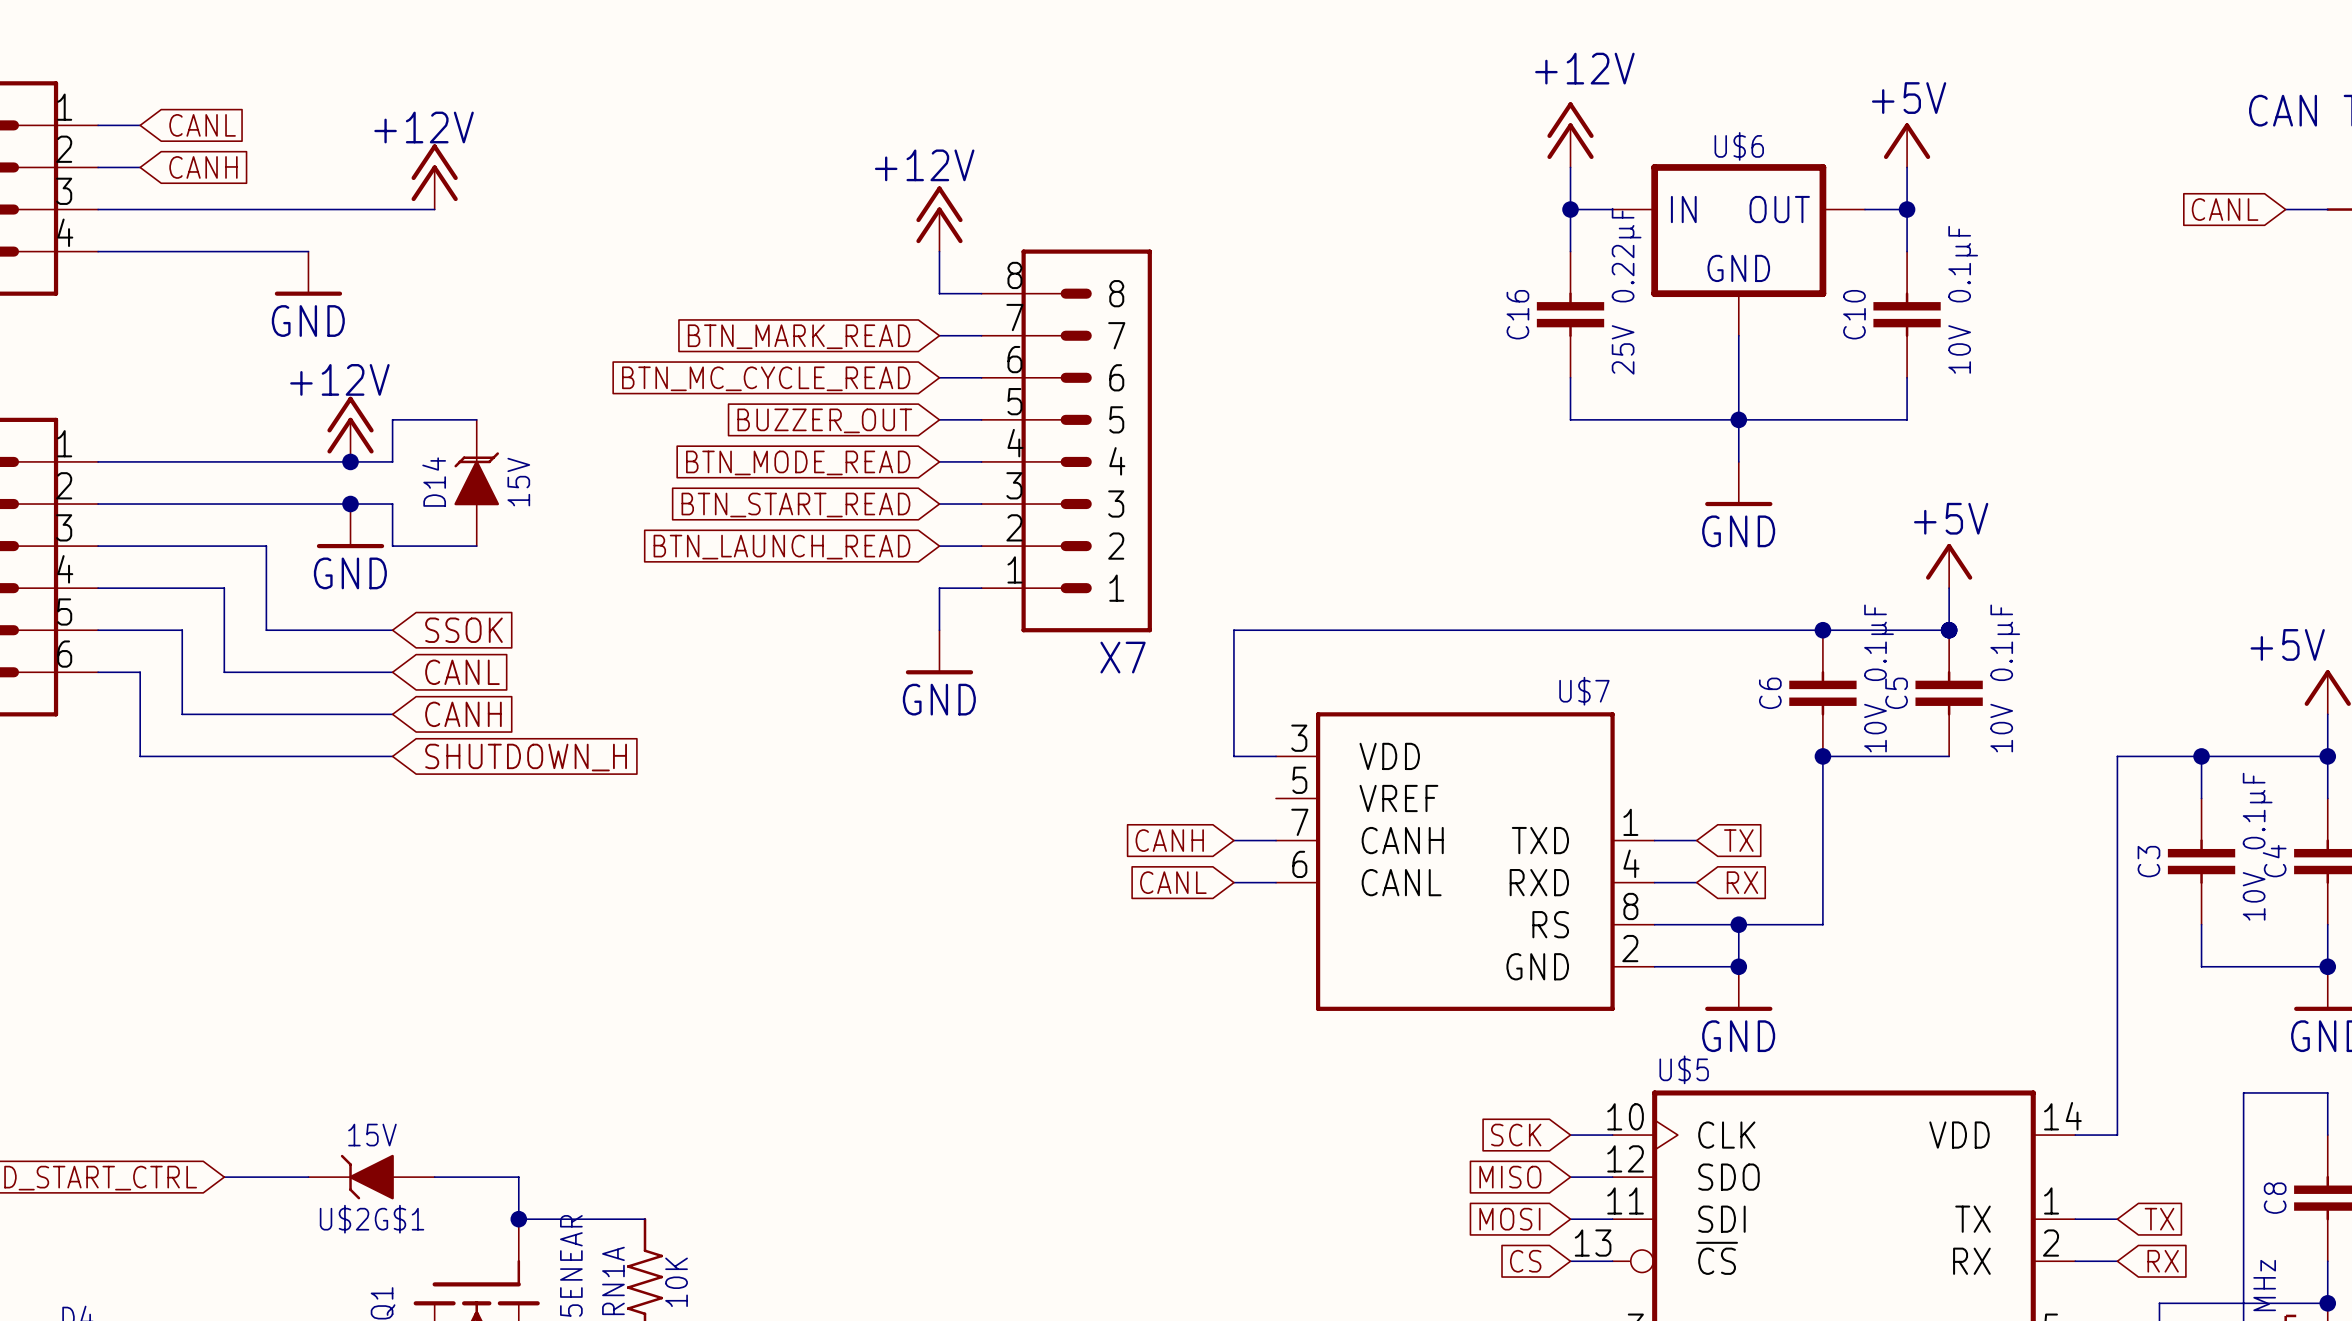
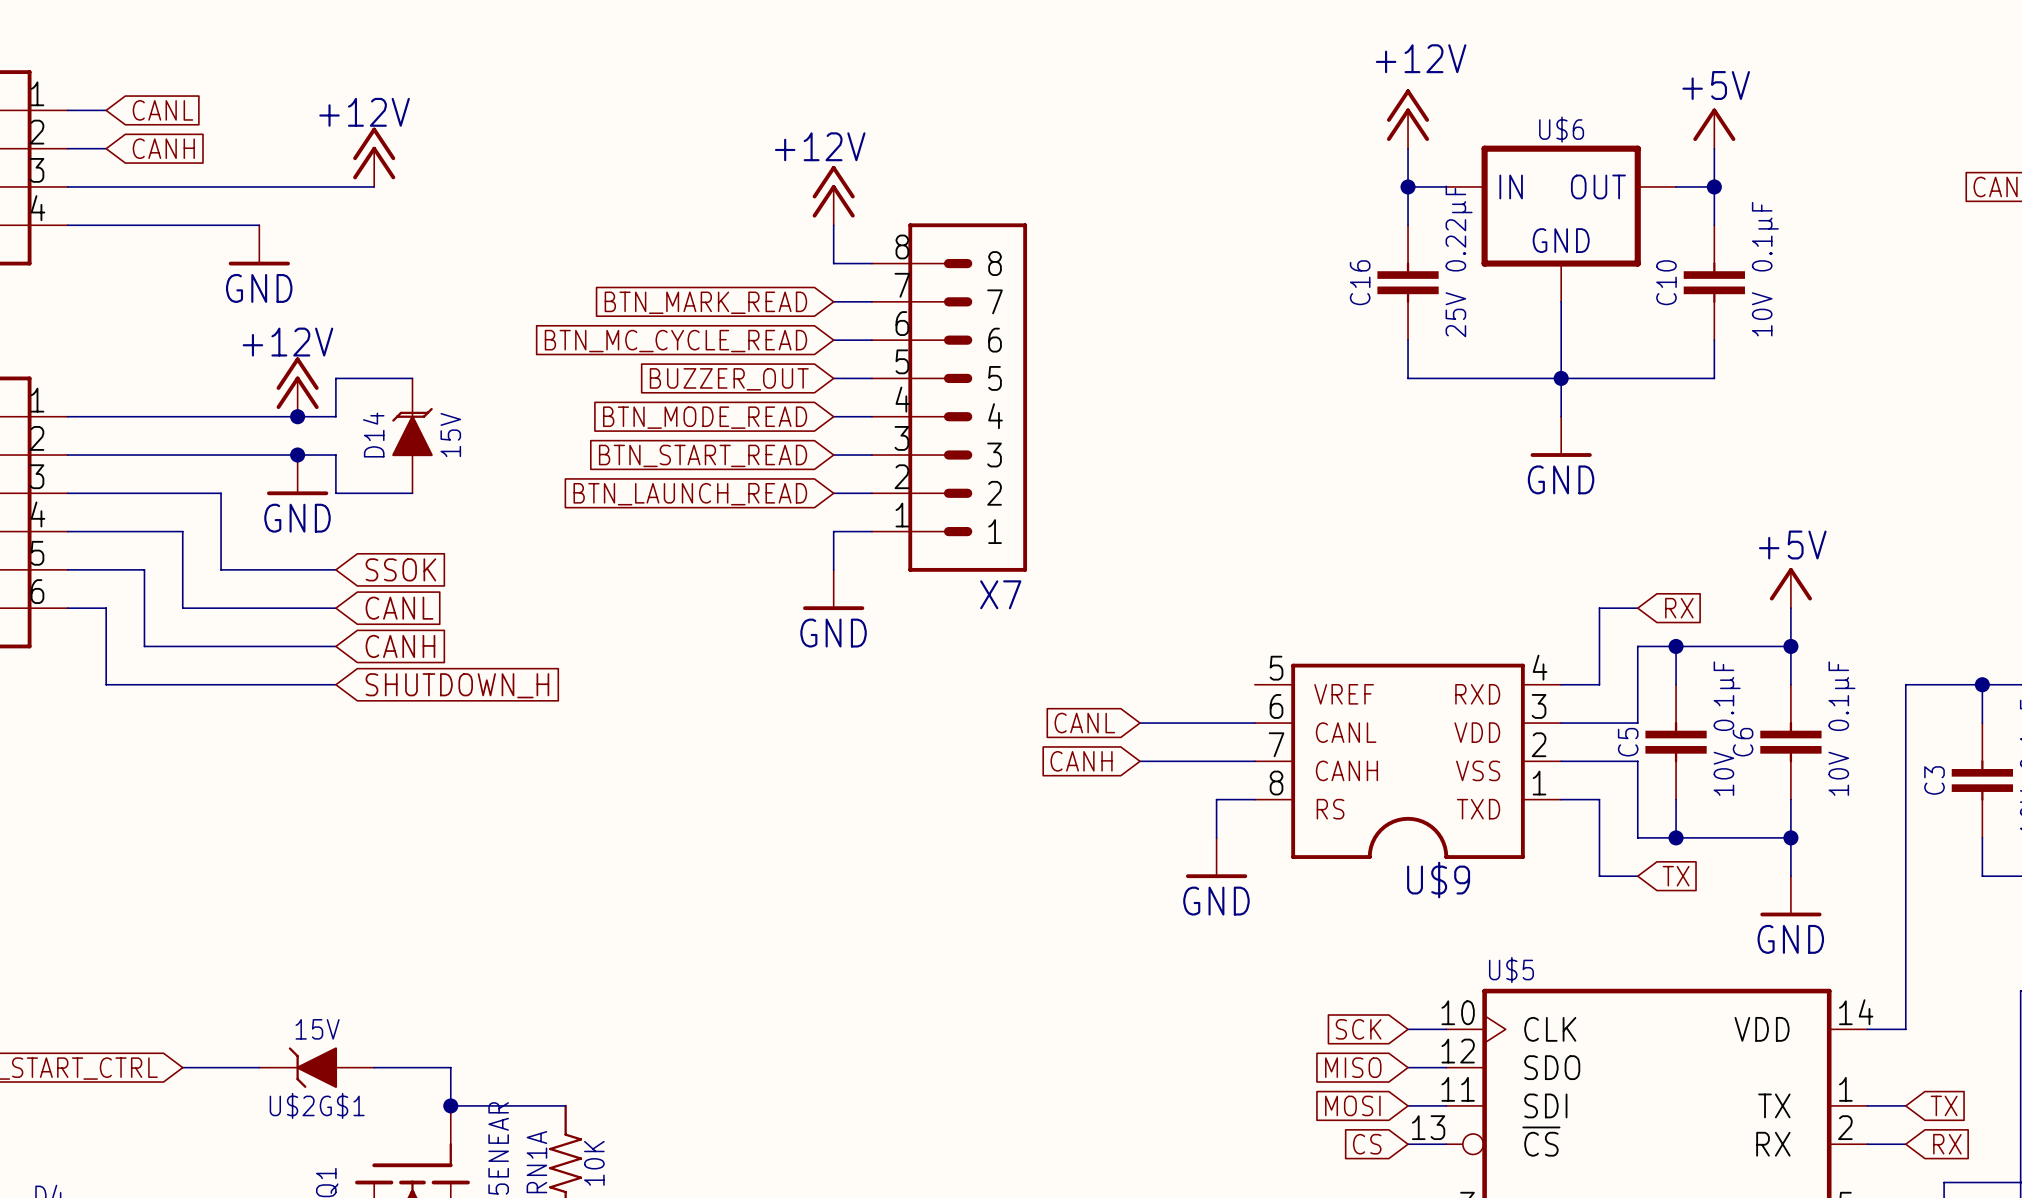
power symbol position: +5V (1949, 566) -> +5V (1790, 588)
wire: (1949, 588) (1949, 630) (1233, 630) (1233, 756) (1276, 756) -> none
junction: (1822, 630) -> none
junction: (1949, 630) -> none
wire: none -> (1637, 608) (1599, 608) (1599, 684) (1561, 684)
wire: none -> (1790, 608) (1790, 684)
C6 position: (1822, 693) -> (1790, 742)
C5 position: (1949, 693) -> (1676, 742)
wire: none -> (1676, 646) (1676, 684)
junction: none -> (1676, 646)
junction: none -> (1790, 646)
wire: (1822, 756) (1949, 756) -> (1637, 684) (1637, 646) (1790, 646)
junction: (1822, 756) -> none
wire: none -> (1139, 723) (1254, 723)
wire: (1822, 798) (1822, 840) -> (1637, 723) (1561, 723)
global label position: CANH (1169, 840) -> CANH (1081, 761)
wire: (1233, 840) (1276, 840) -> (1254, 761) (1139, 761)
U$9: none -> (1408, 761)
wire: (1654, 840) (1696, 840) -> none
wire: none -> (1561, 761) (1637, 761)
global label position: TX (1738, 840) -> TX (1676, 876)
U$7: (1465, 861) -> none
global label position: CANL (1173, 882) -> CANL (1084, 723)
wire: (1233, 882) (1276, 882) -> none
wire: none -> (1254, 799) (1216, 799) (1216, 837)
wire: (1654, 882) (1696, 882) -> none
wire: none -> (1561, 799) (1599, 799) (1599, 876) (1637, 876)
global label position: RX (1742, 882) -> RX (1679, 608)
wire: none -> (1676, 799) (1676, 837)
wire: none -> (1790, 799) (1790, 876)
wire: (1654, 924) (1822, 924) -> (1790, 837) (1637, 837)
wire: (1738, 924) (1738, 966) (1654, 966) -> none
junction: (1738, 924) -> none
junction: none -> (1676, 837)
junction: none -> (1790, 837)
power symbol: none -> GND (1216, 858)
junction: (1738, 966) -> none
power symbol: GND (1738, 988) -> none
power symbol: none -> GND (1790, 896)

